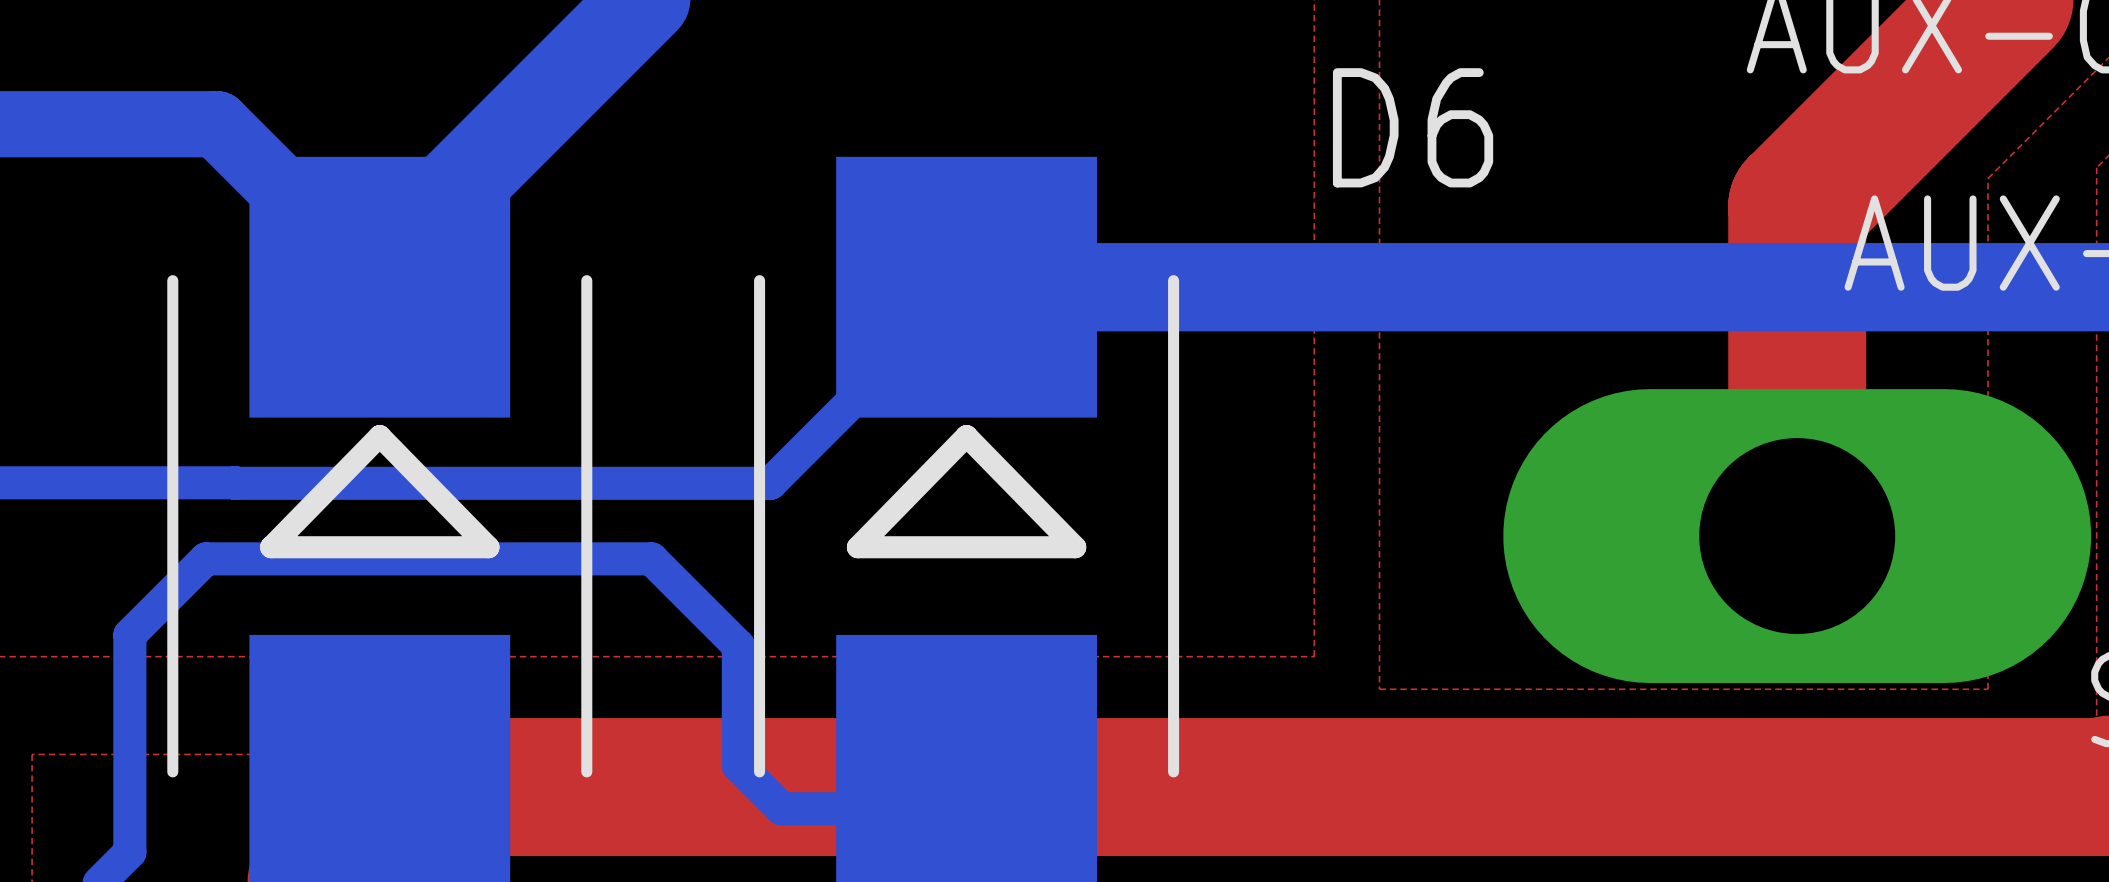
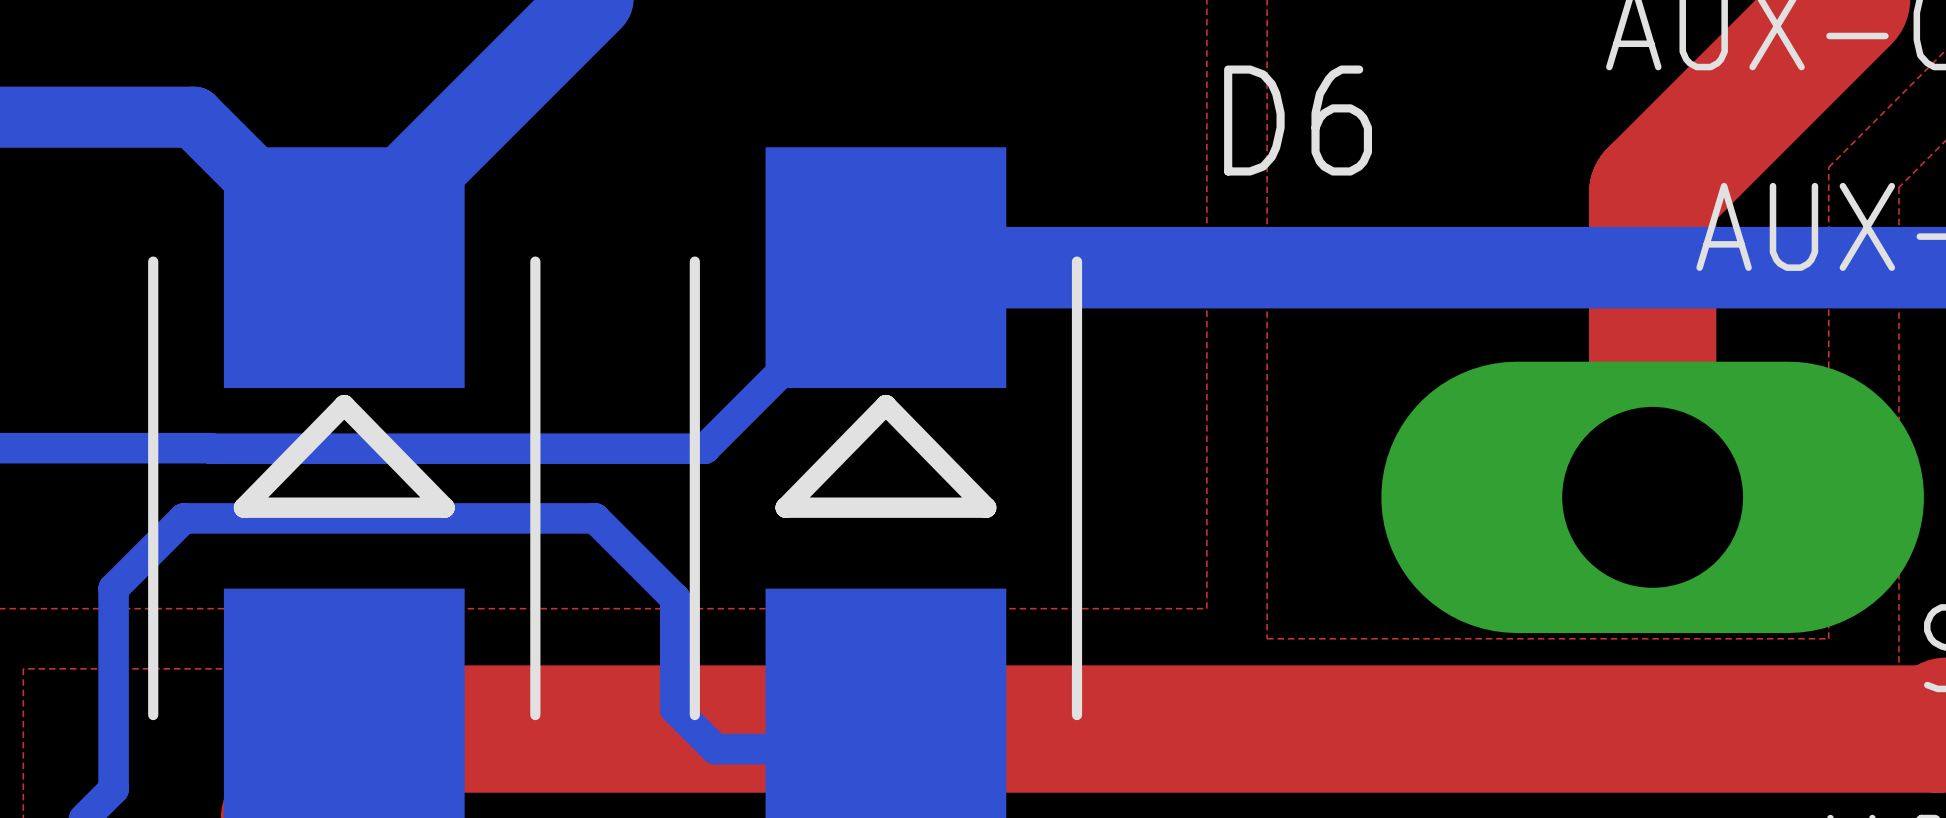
top zone outline: (2096, 167) (2096, 754) (32, 754) -> (1929, 157) (1898, 187) (1898, 668) (23, 668) (23, 698)

